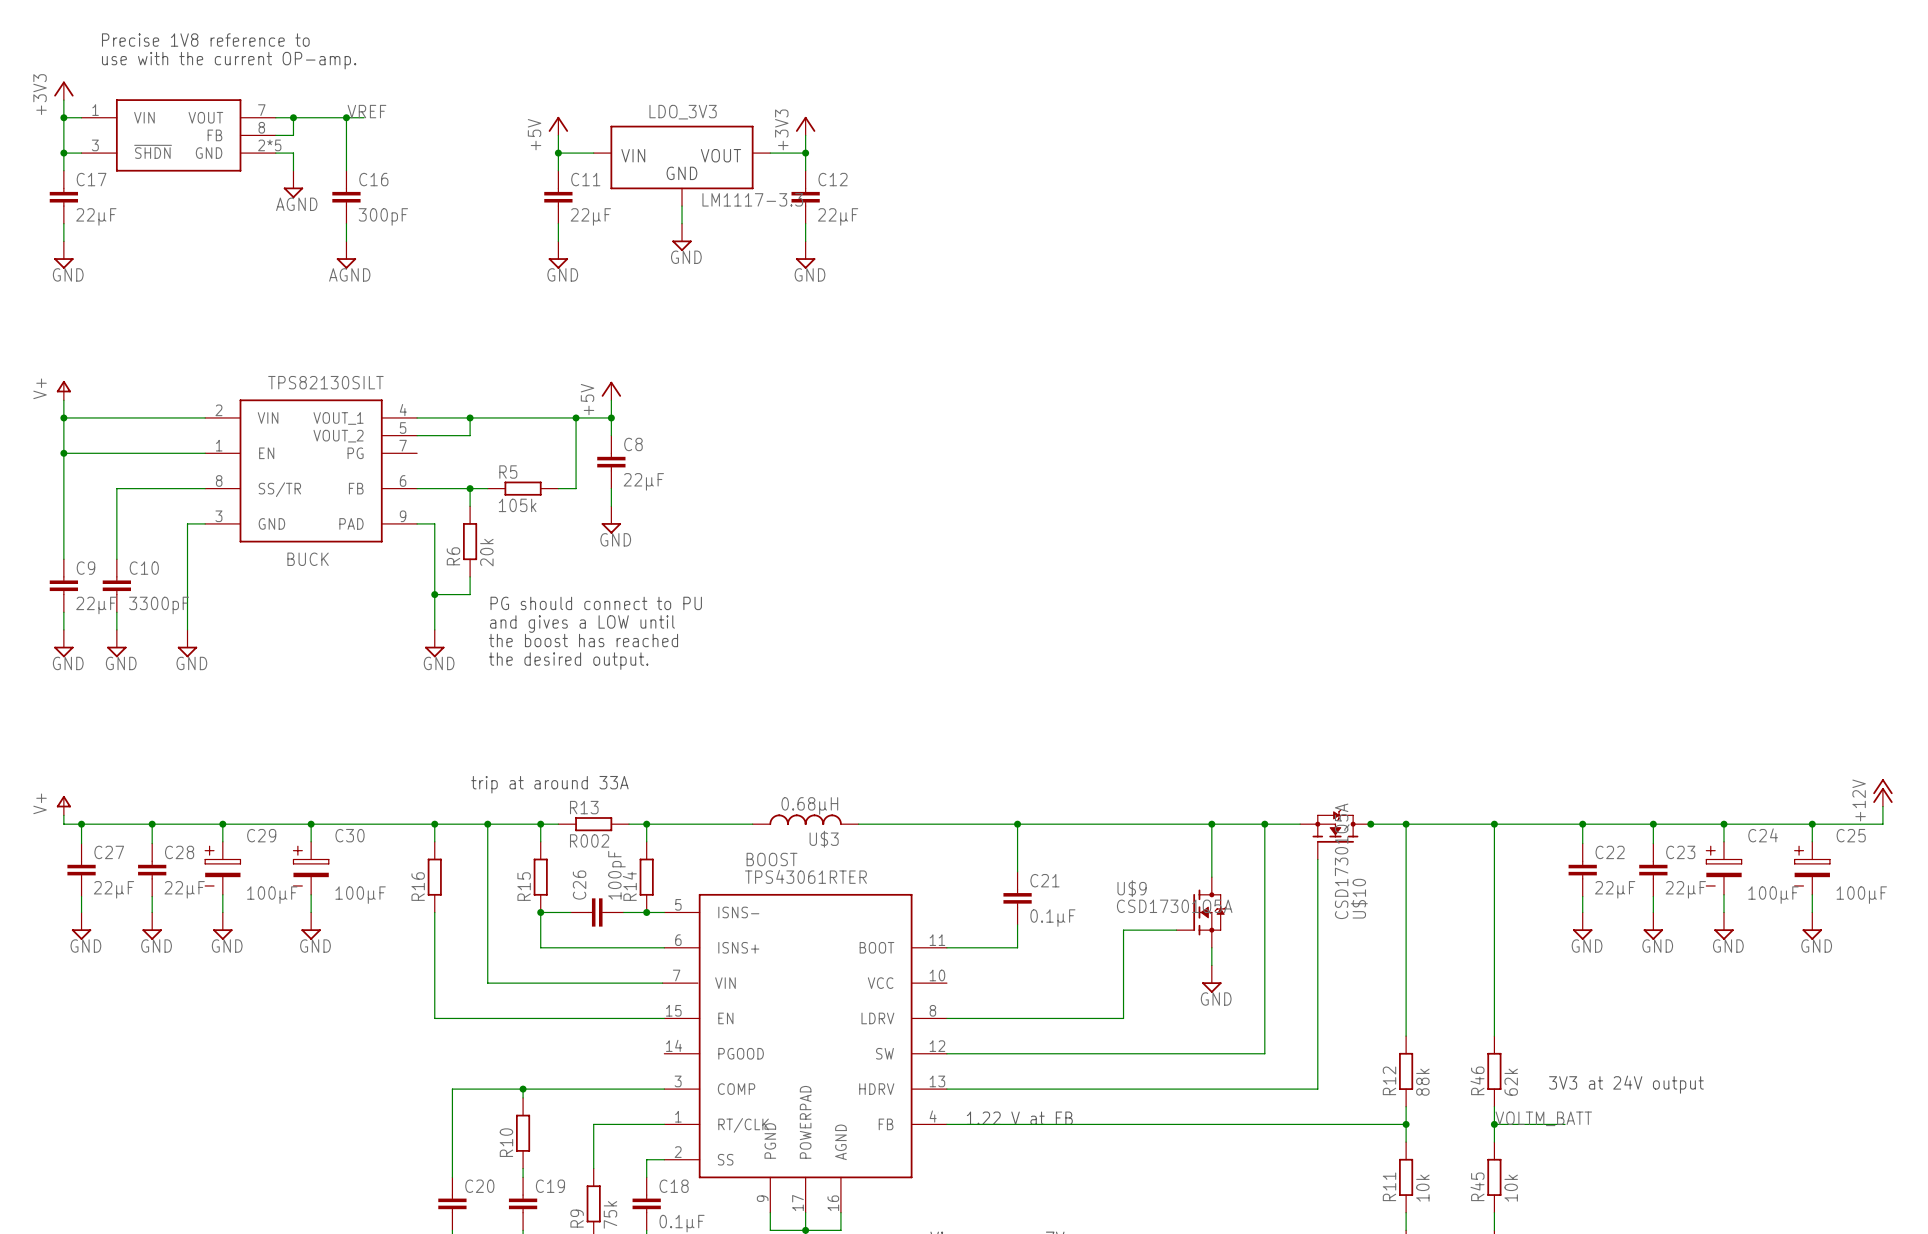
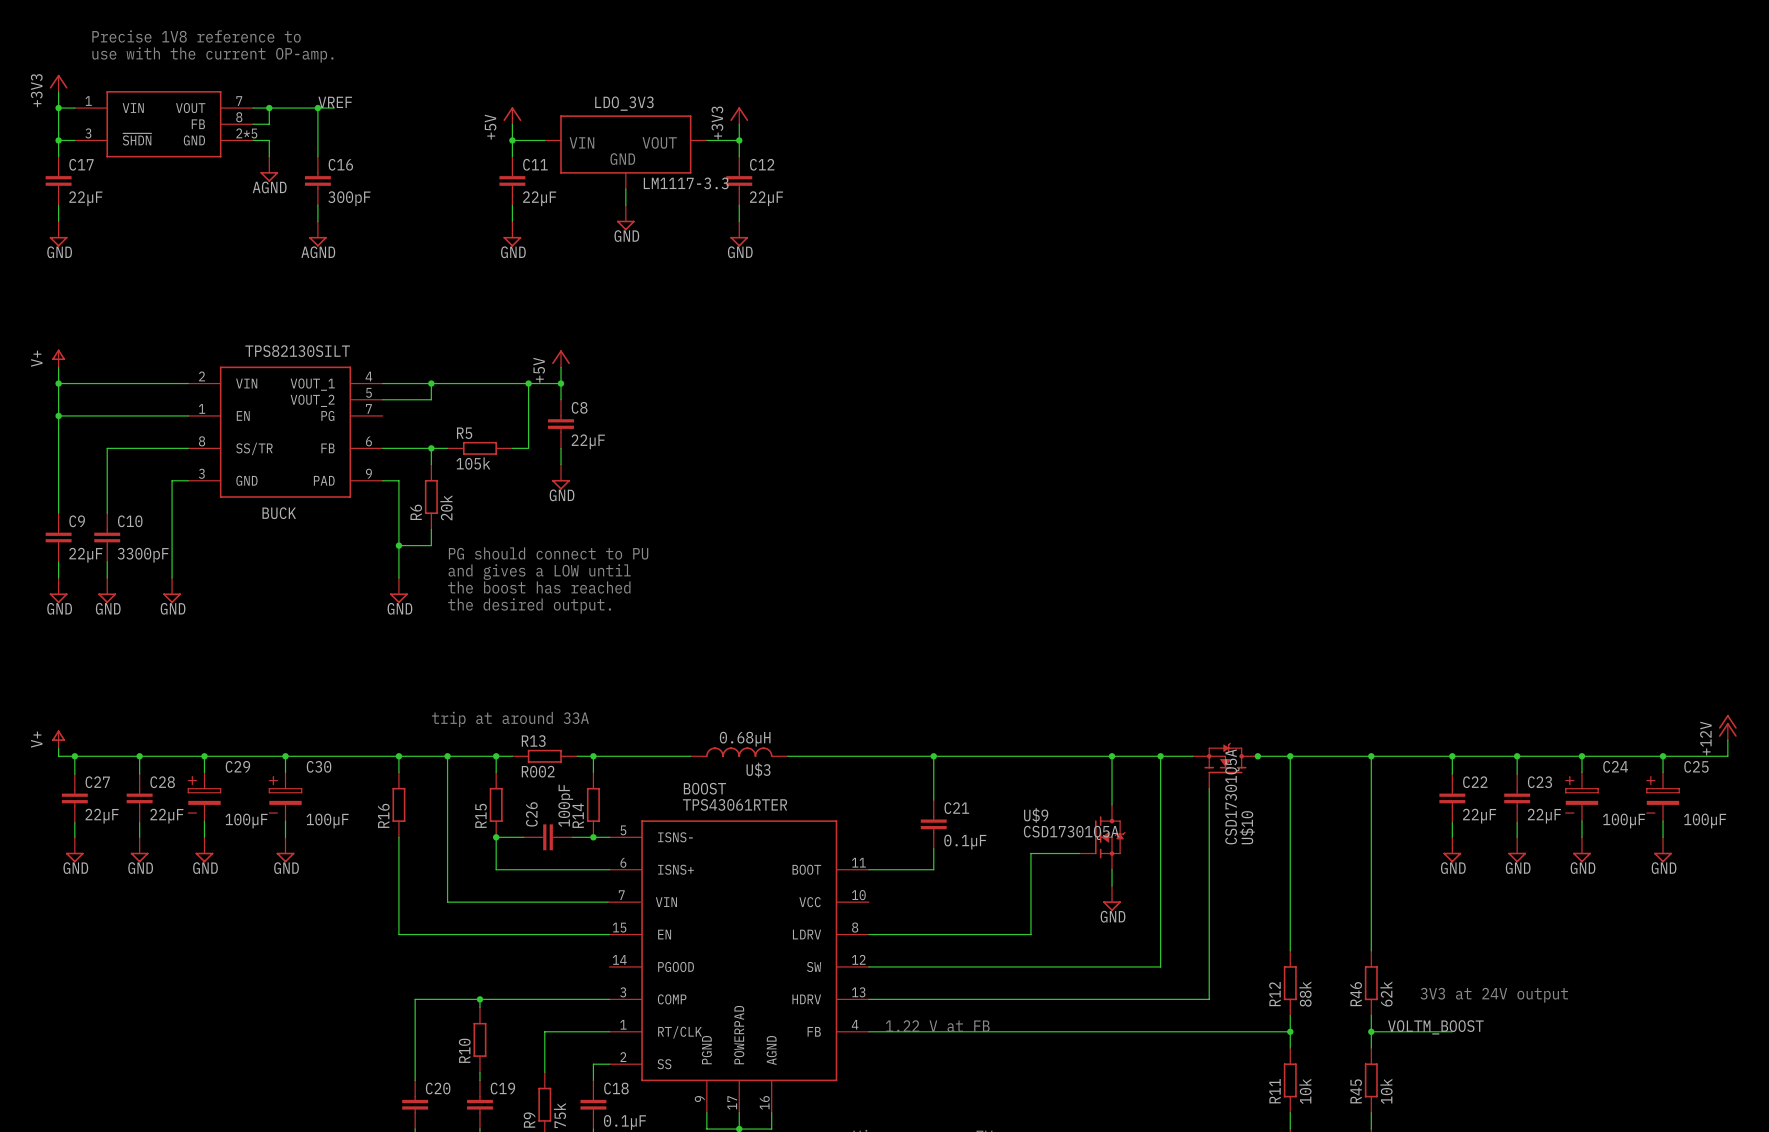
label: VOLTM_BATT (1543, 1118) -> VOLTM_BOOST (1435, 1027)
wire: none -> (1436, 1031) (1452, 1031)

